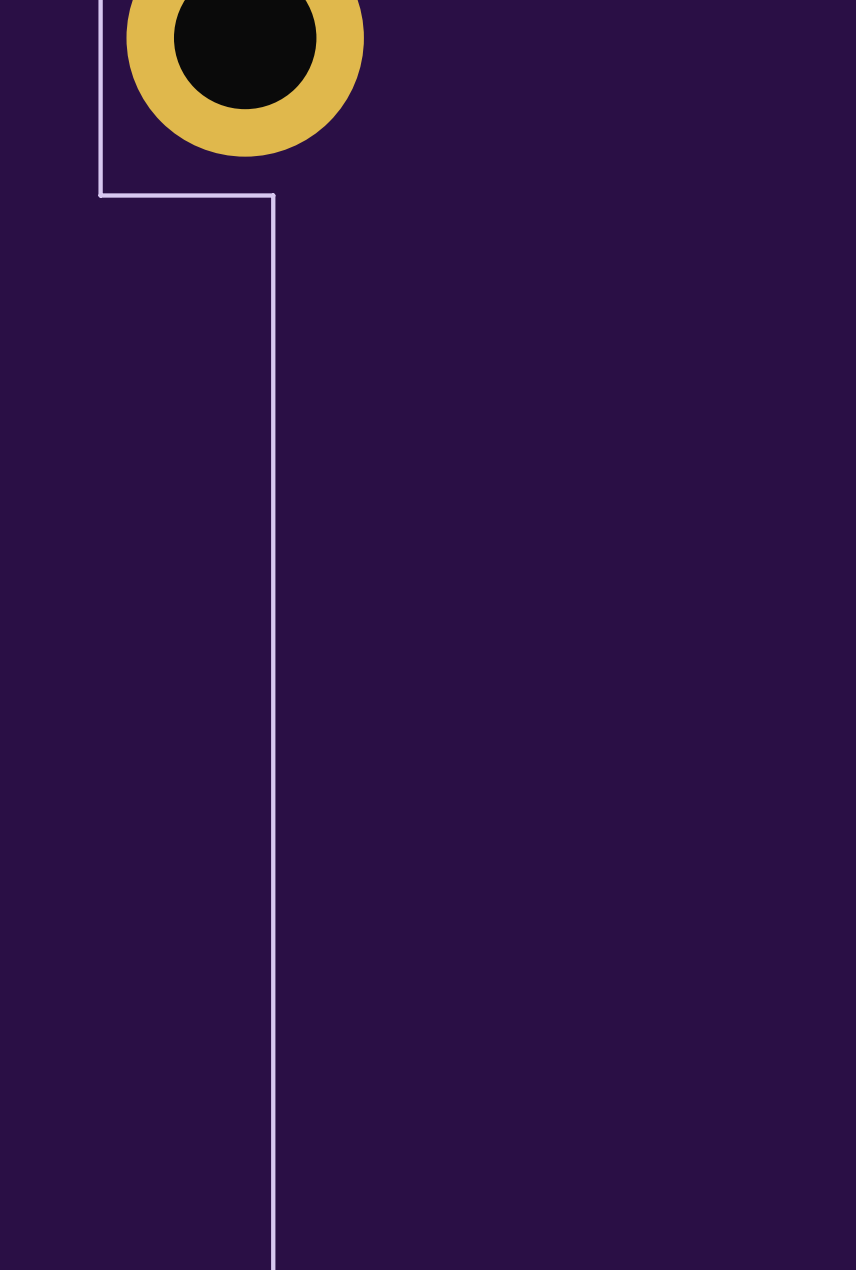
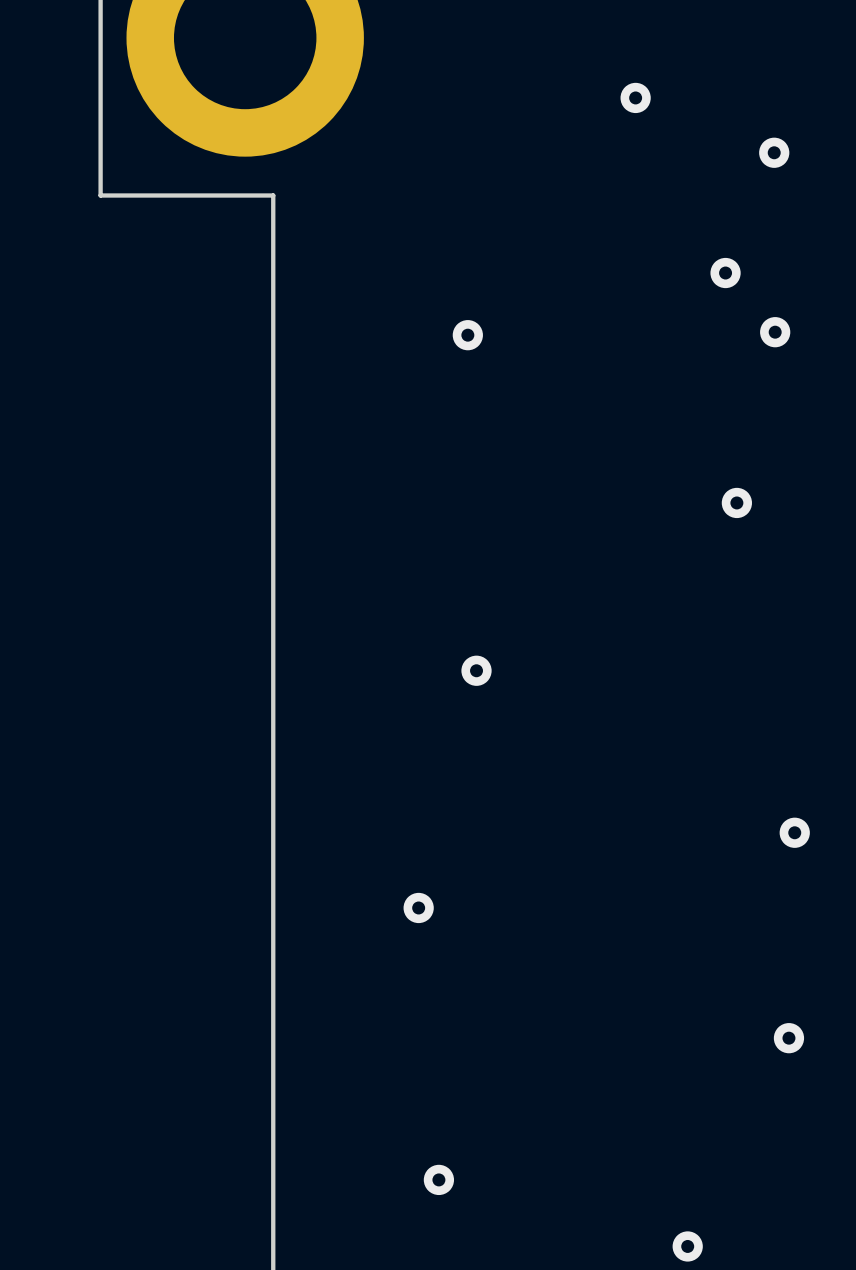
via: none -> (635, 97)
via: none -> (774, 152)
via: none -> (725, 273)
via: none -> (775, 332)
via: none -> (467, 335)
via: none -> (736, 502)
via: none -> (476, 670)
via: none -> (794, 832)
via: none -> (418, 907)
via: none -> (788, 1038)
via: none -> (438, 1179)
via: none -> (687, 1246)

